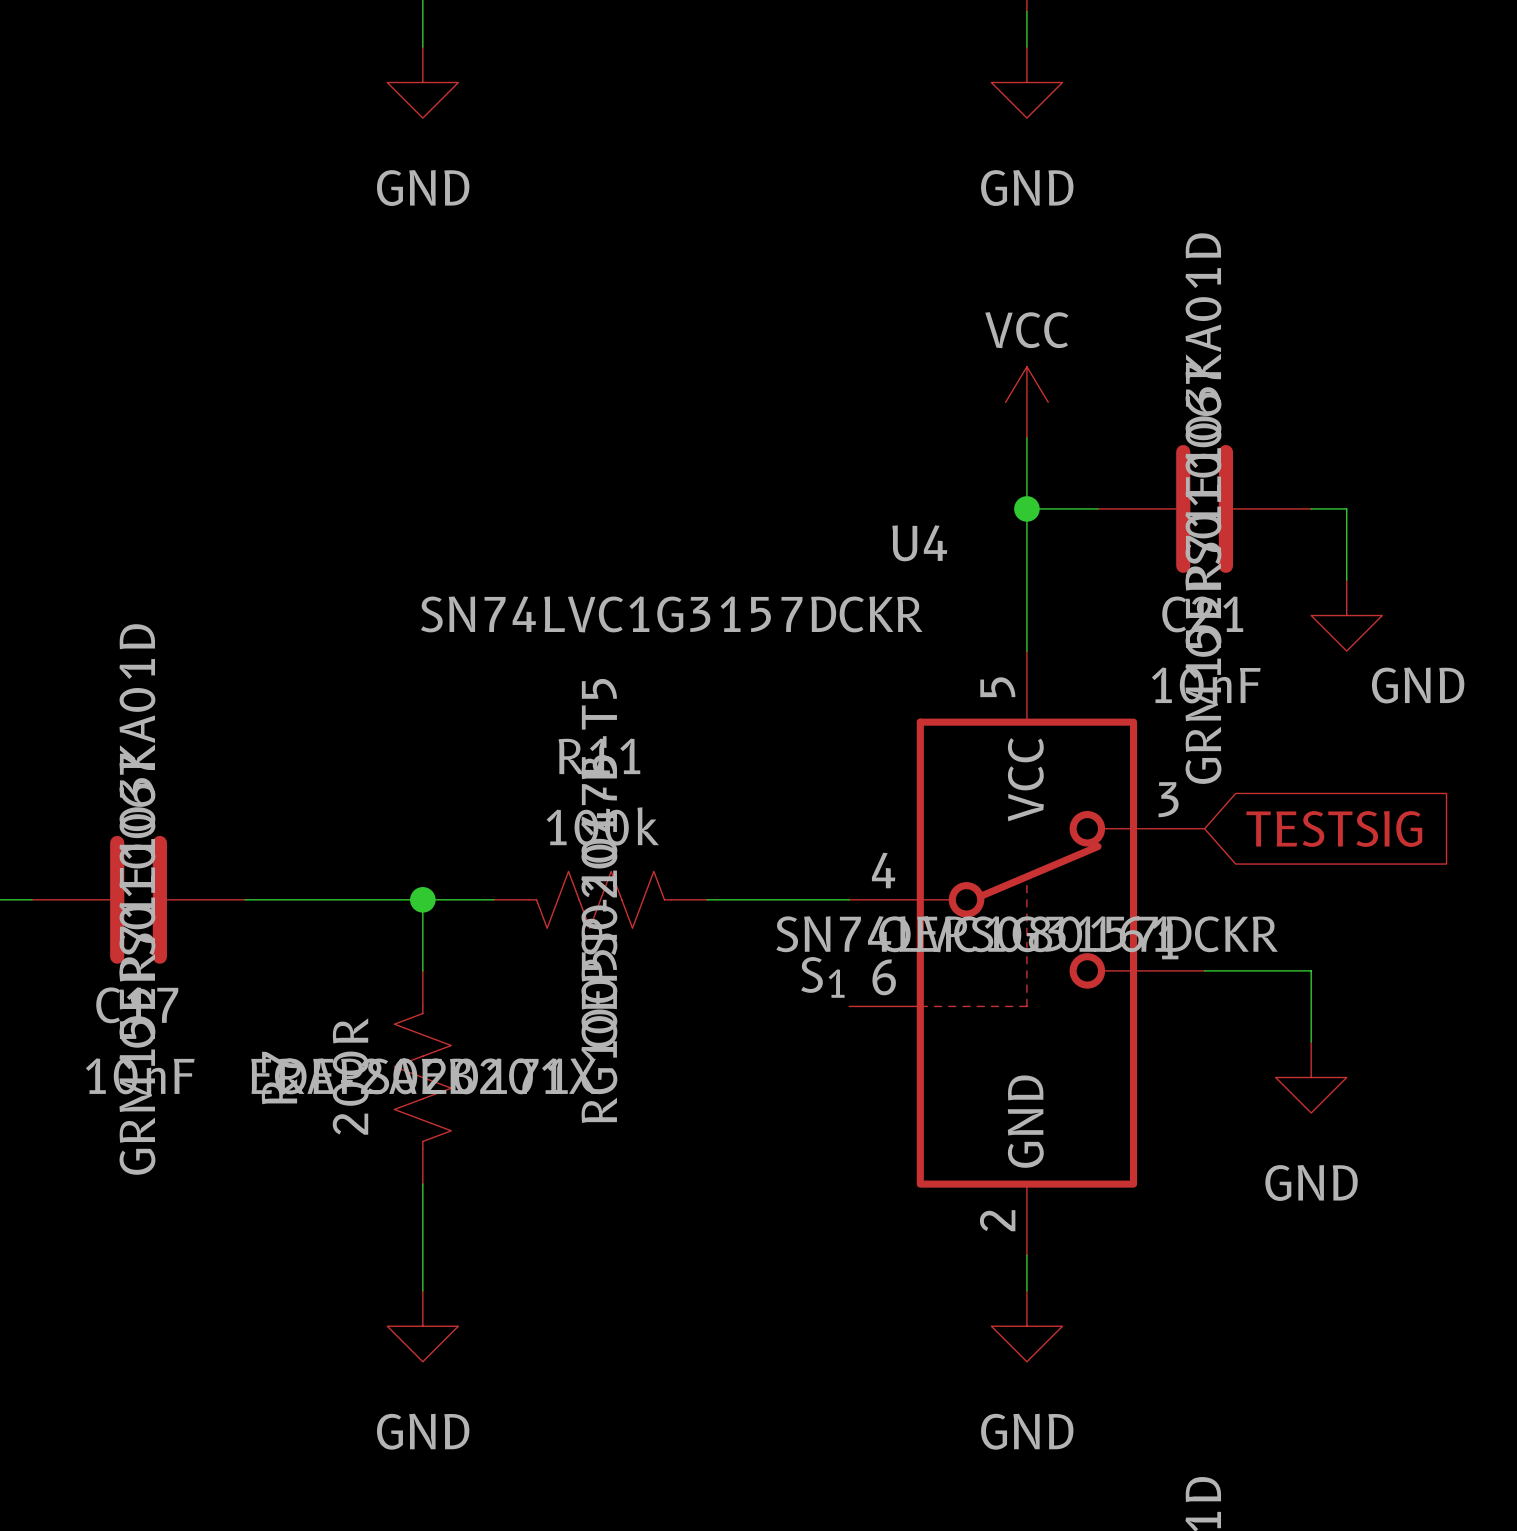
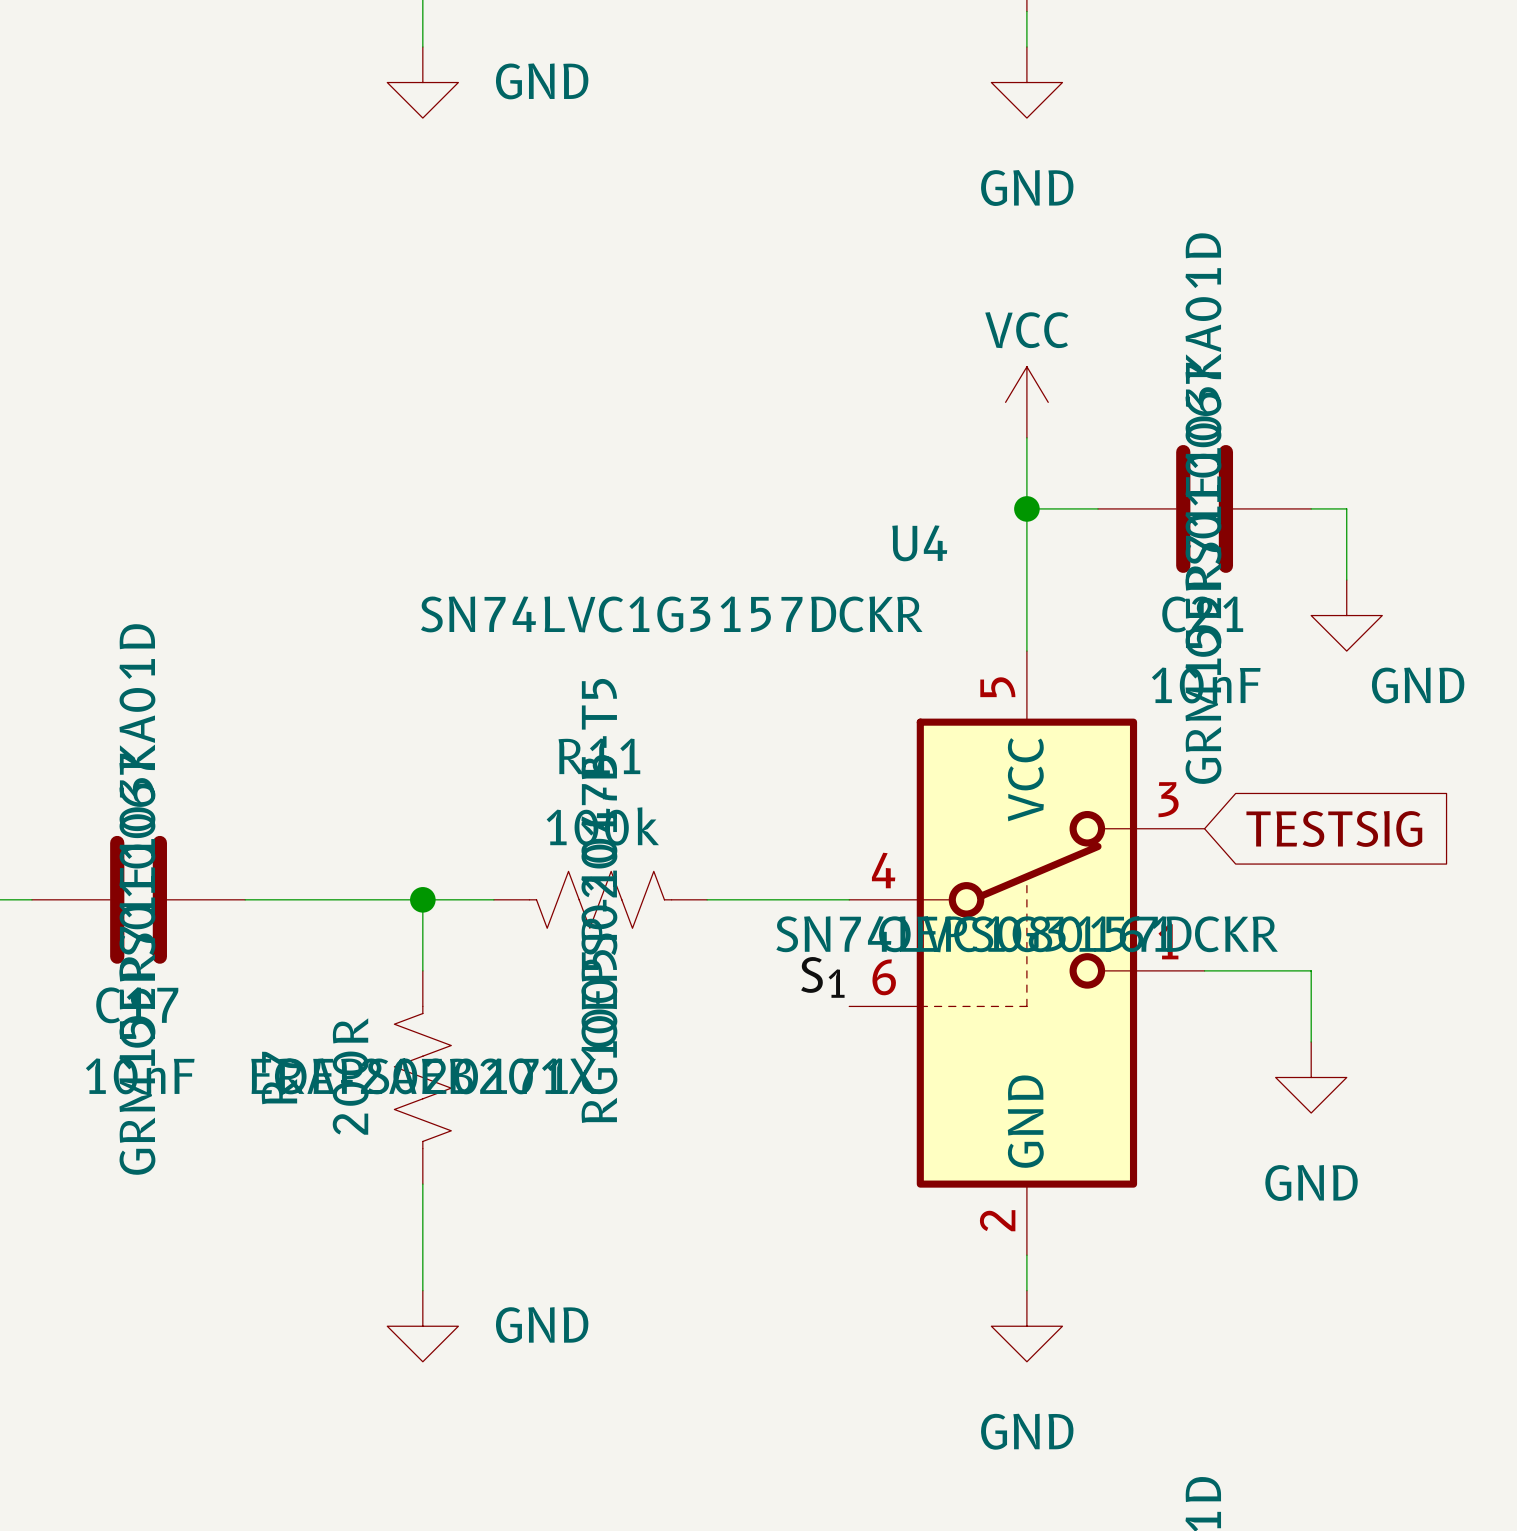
power symbol text position: GND (423, 188) -> GND (542, 81)
power symbol text position: GND (423, 1431) -> GND (542, 1325)

